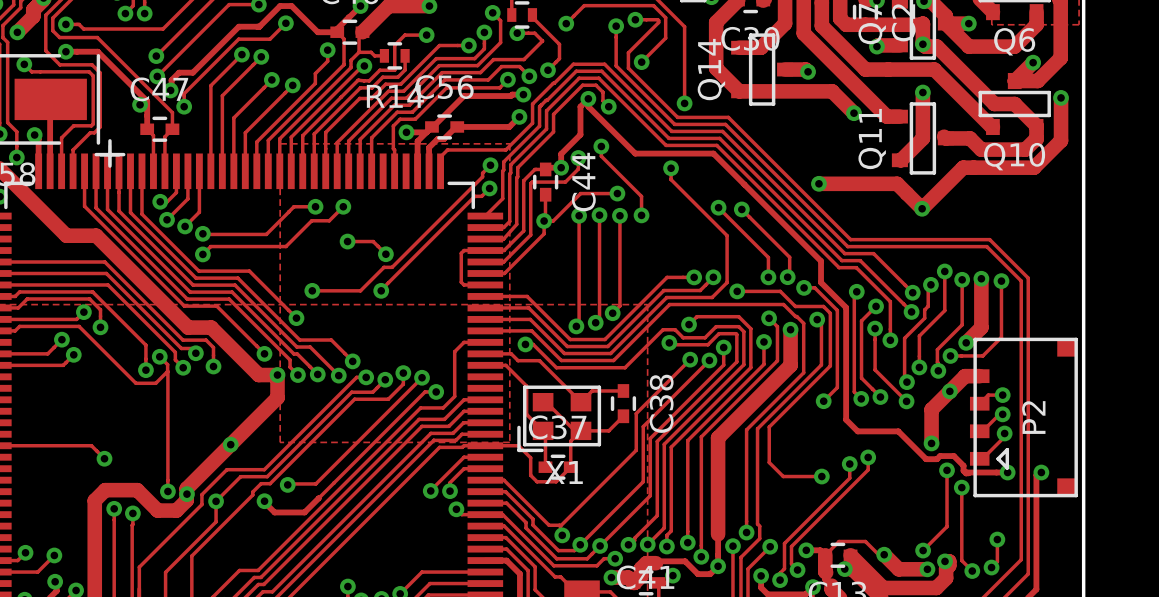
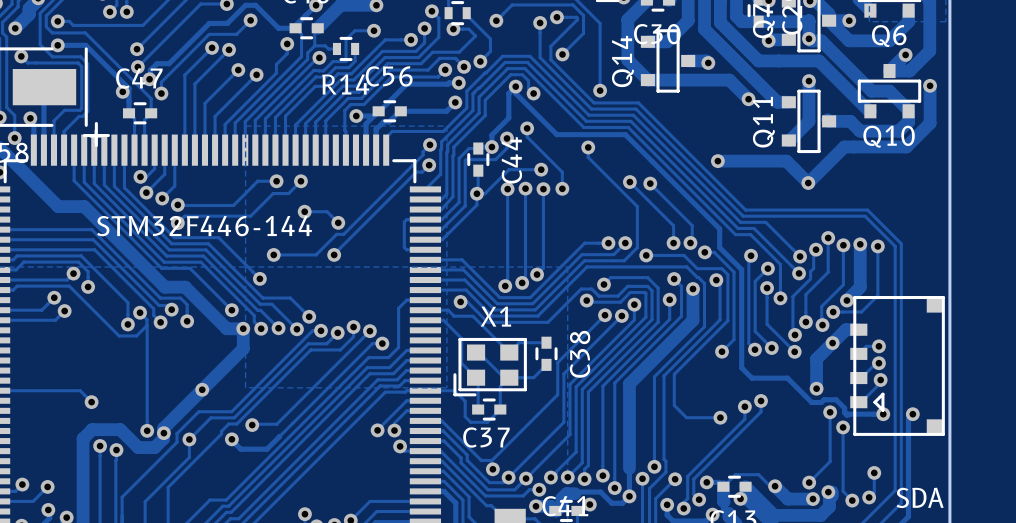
part value: none -> STM32F446-144 (204, 226)
P2 name: P2 (1033, 417) -> none
C37 name position: C37 (557, 427) -> C37 (486, 437)
X1 name position: X1 (563, 472) -> X1 (495, 316)
part value: none -> SDA (920, 497)

